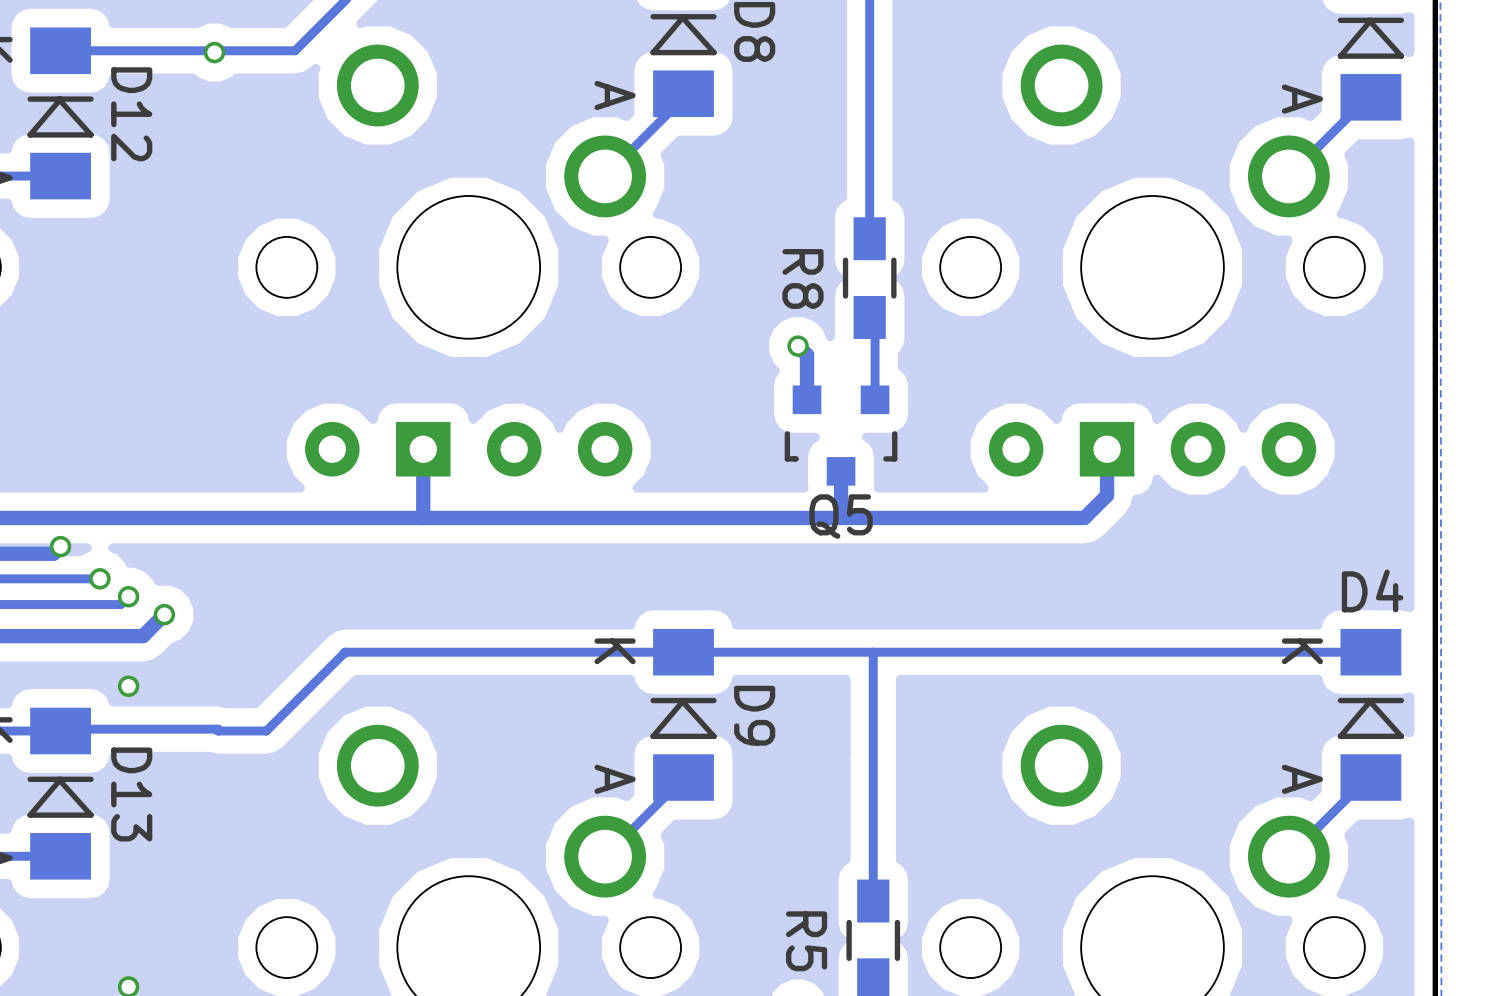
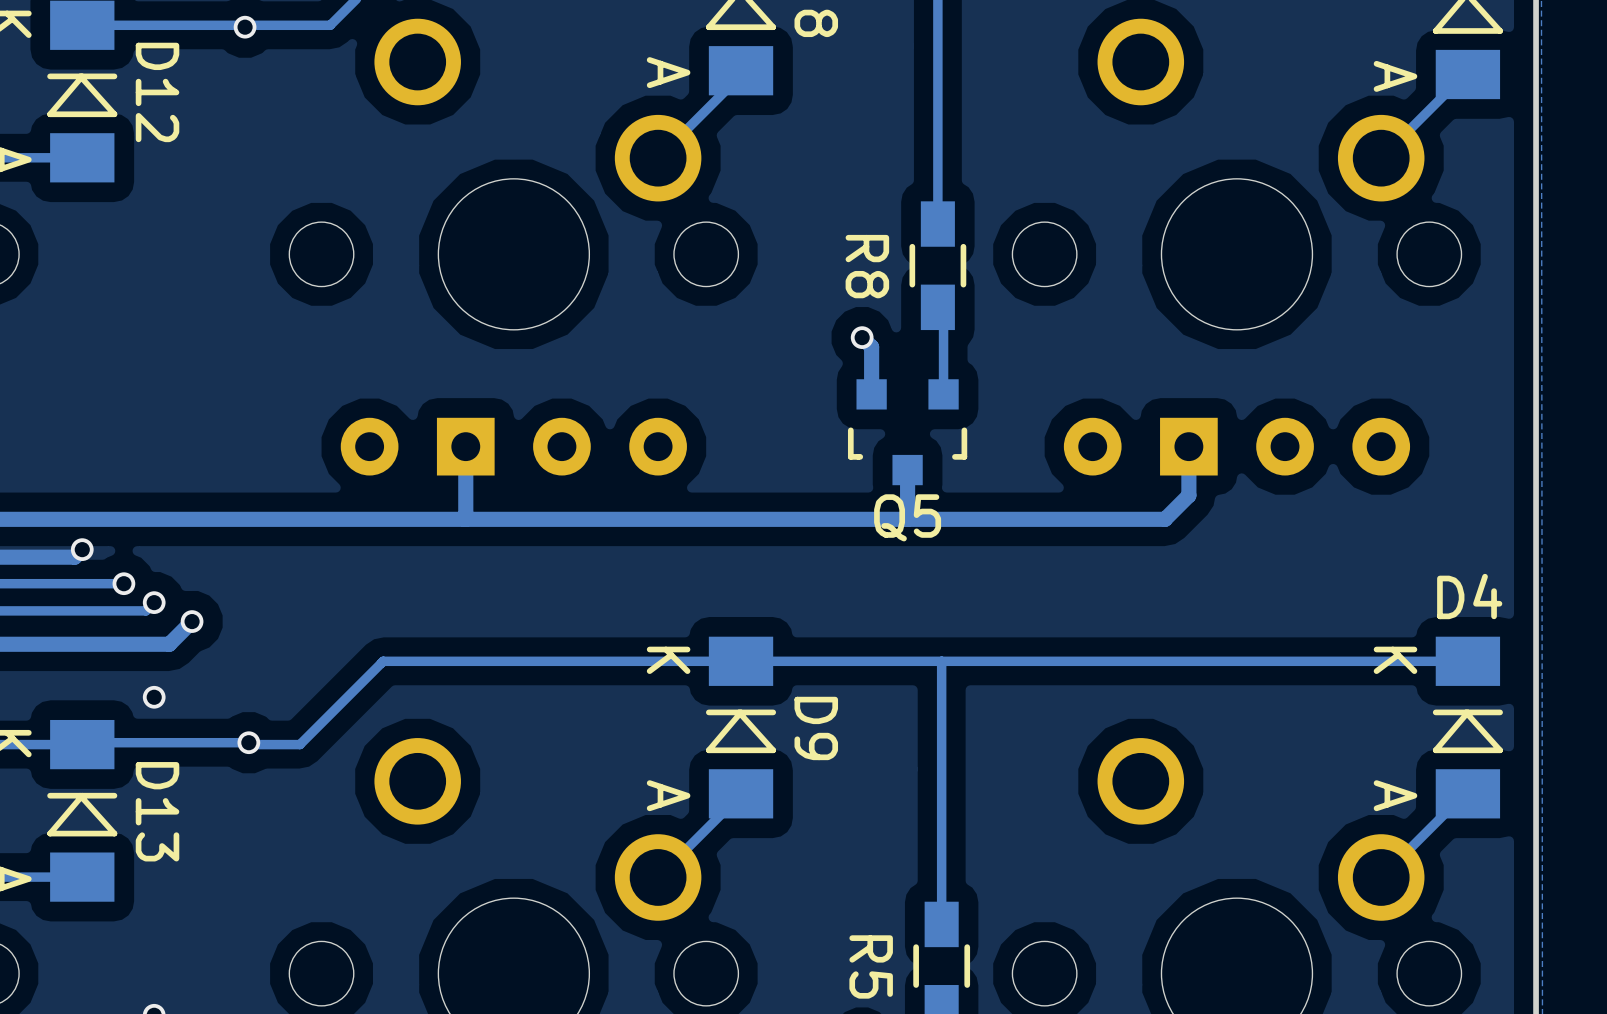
via: none -> (248, 742)

